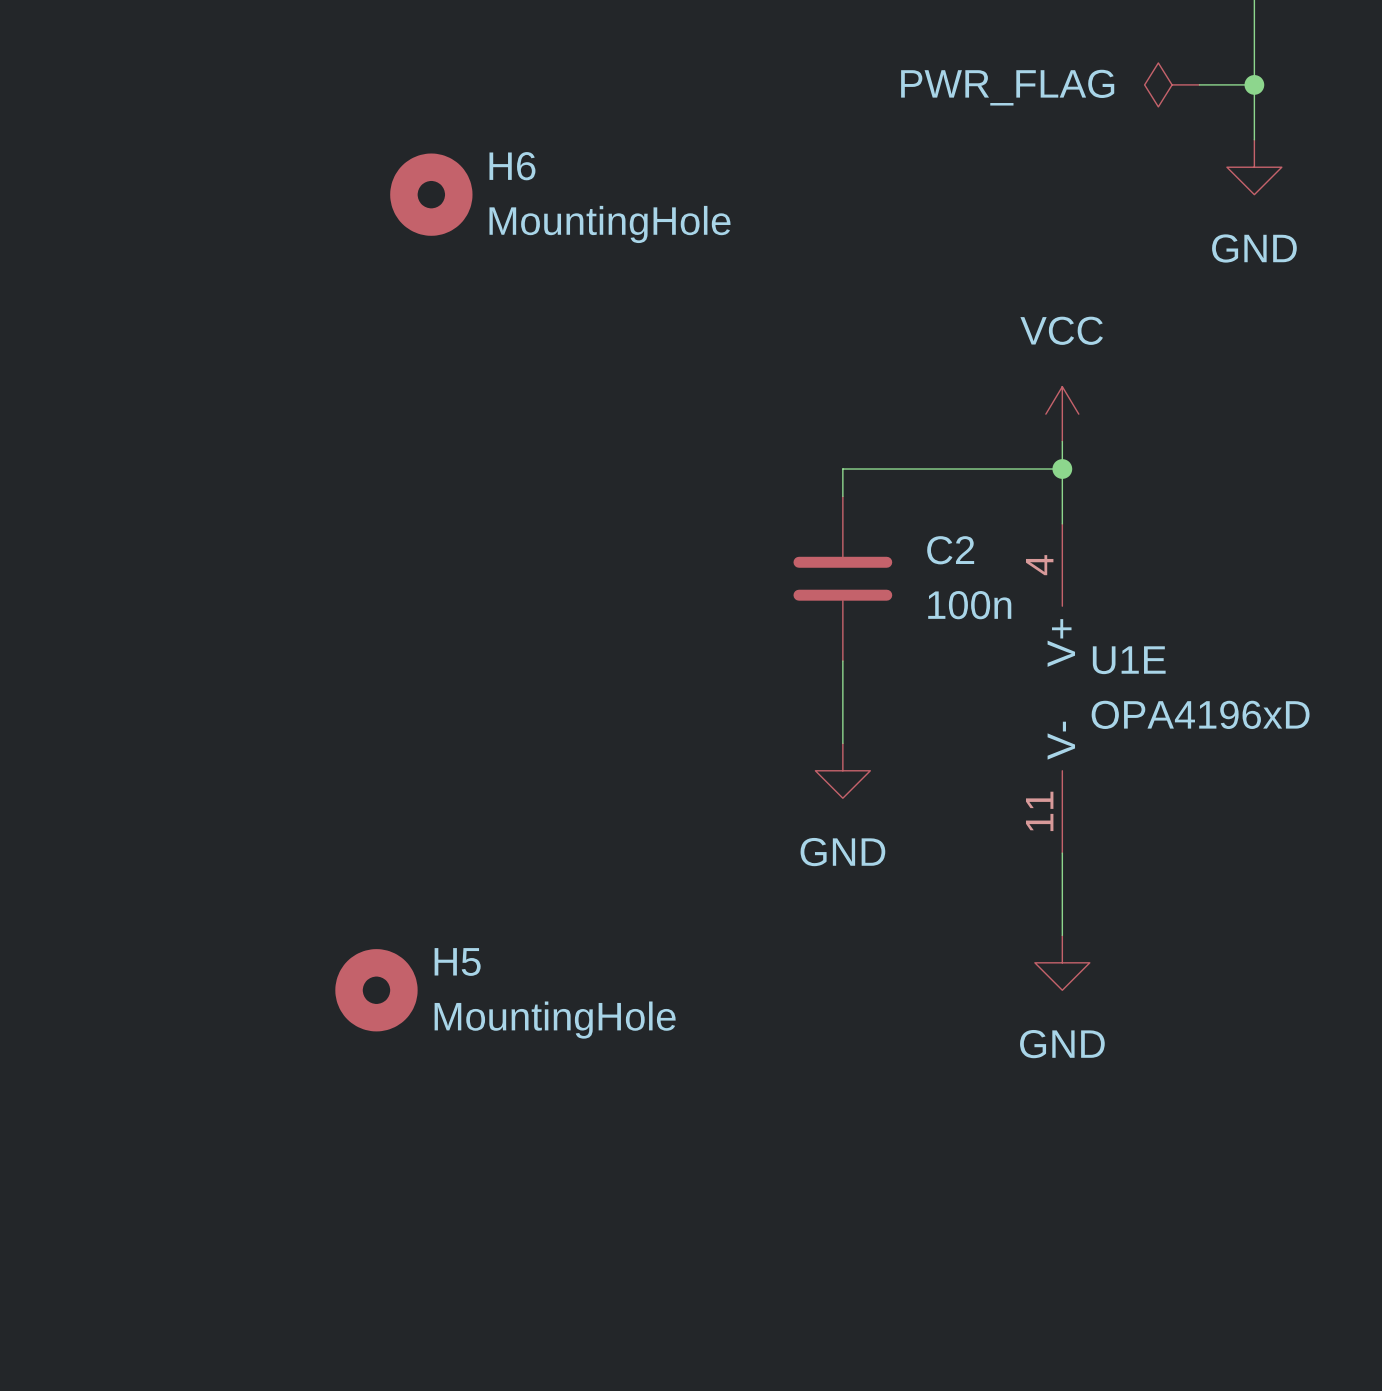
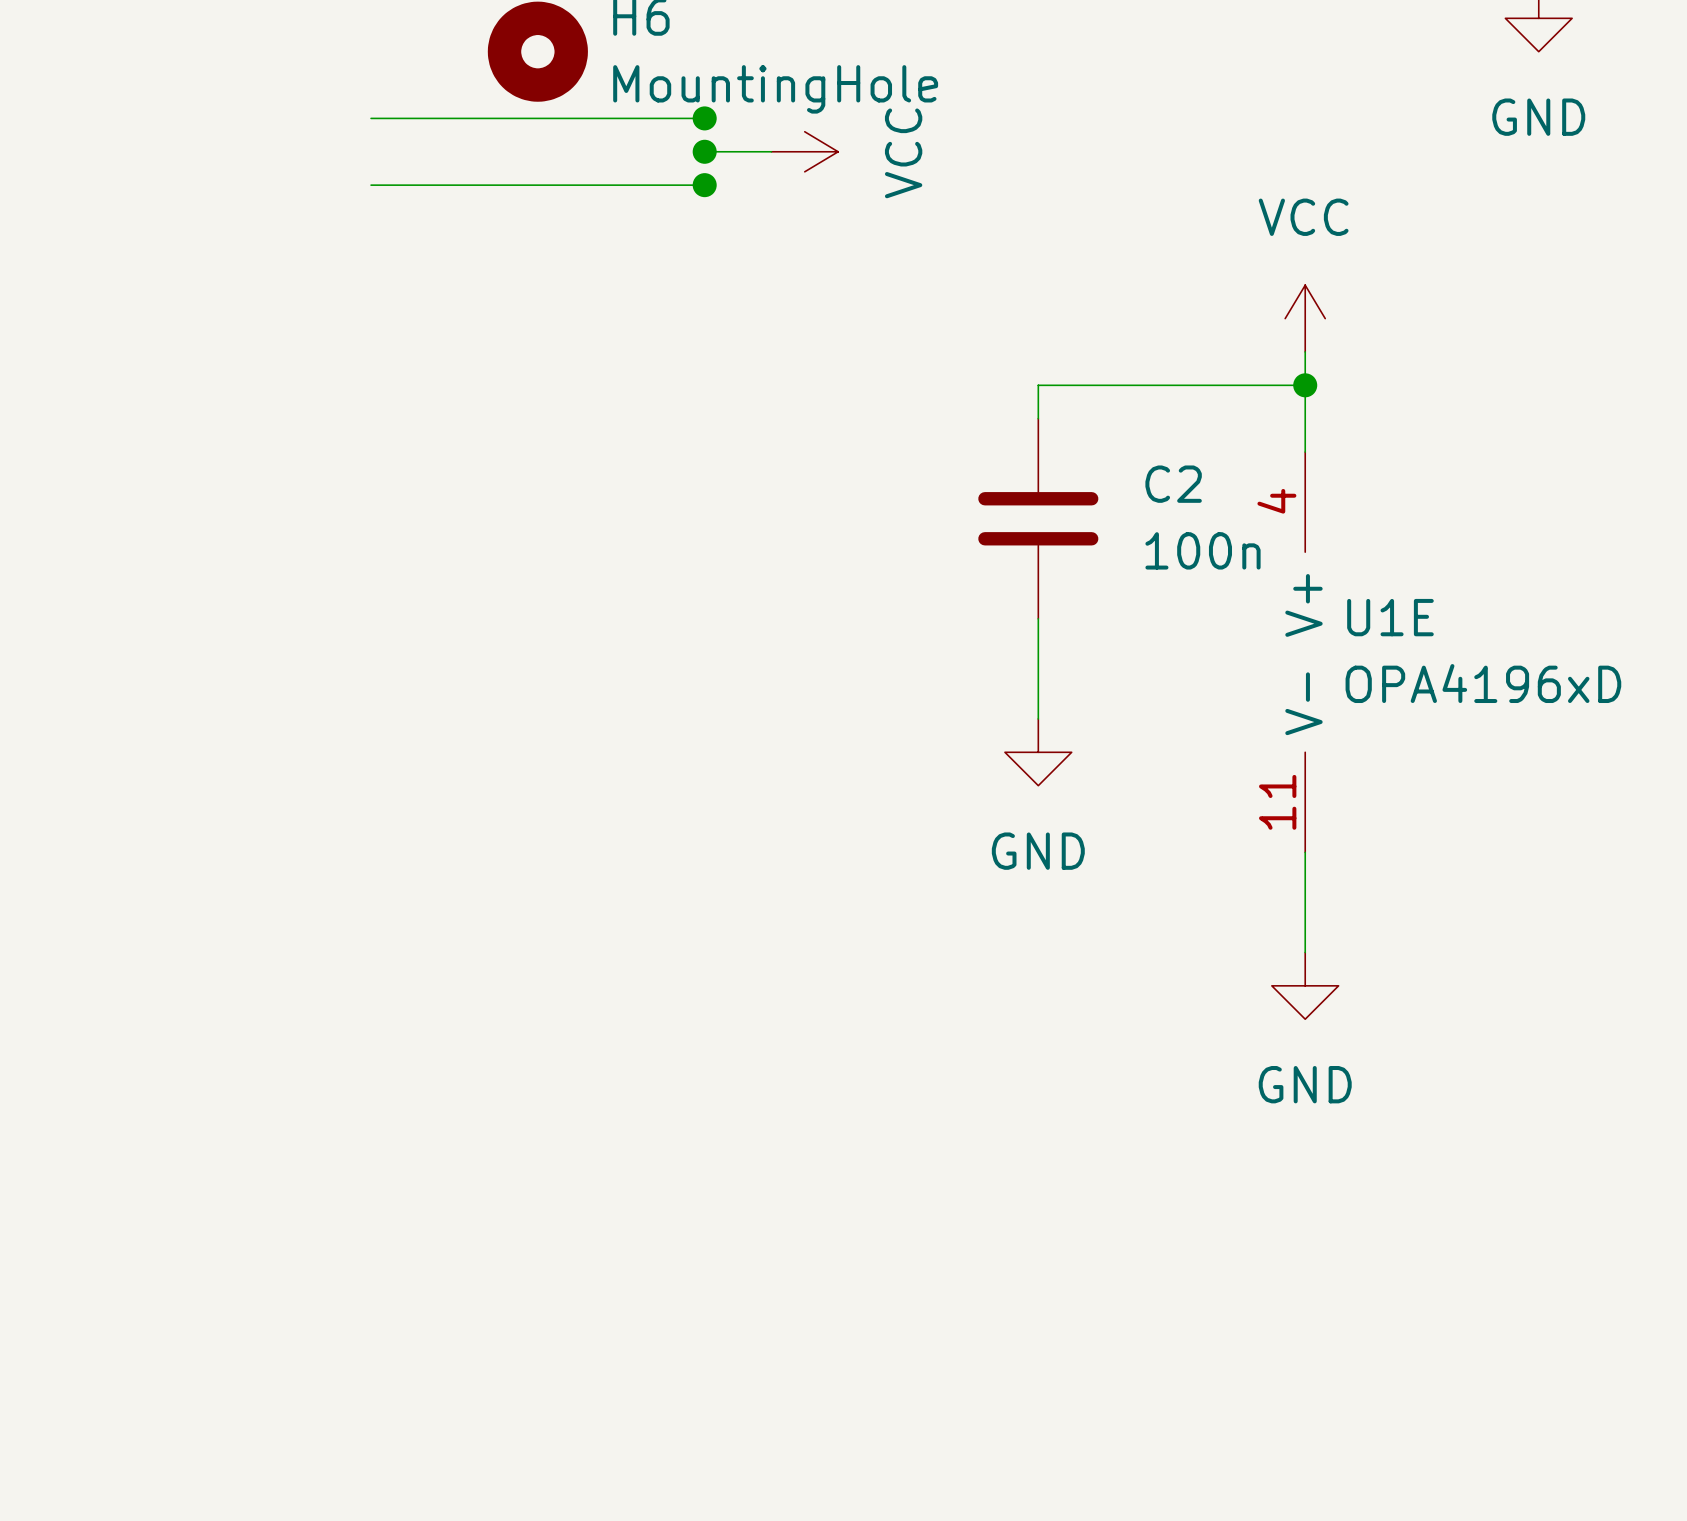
wire: none -> (371, 118) (704, 118)
junction: none -> (704, 118)
wire: none -> (704, 151) (771, 151)
junction: none -> (704, 151)
power symbol: none -> VCC (804, 151)
wire: none -> (371, 185) (704, 185)
junction: none -> (704, 185)
H5: MountingHole (376, 990) -> none

